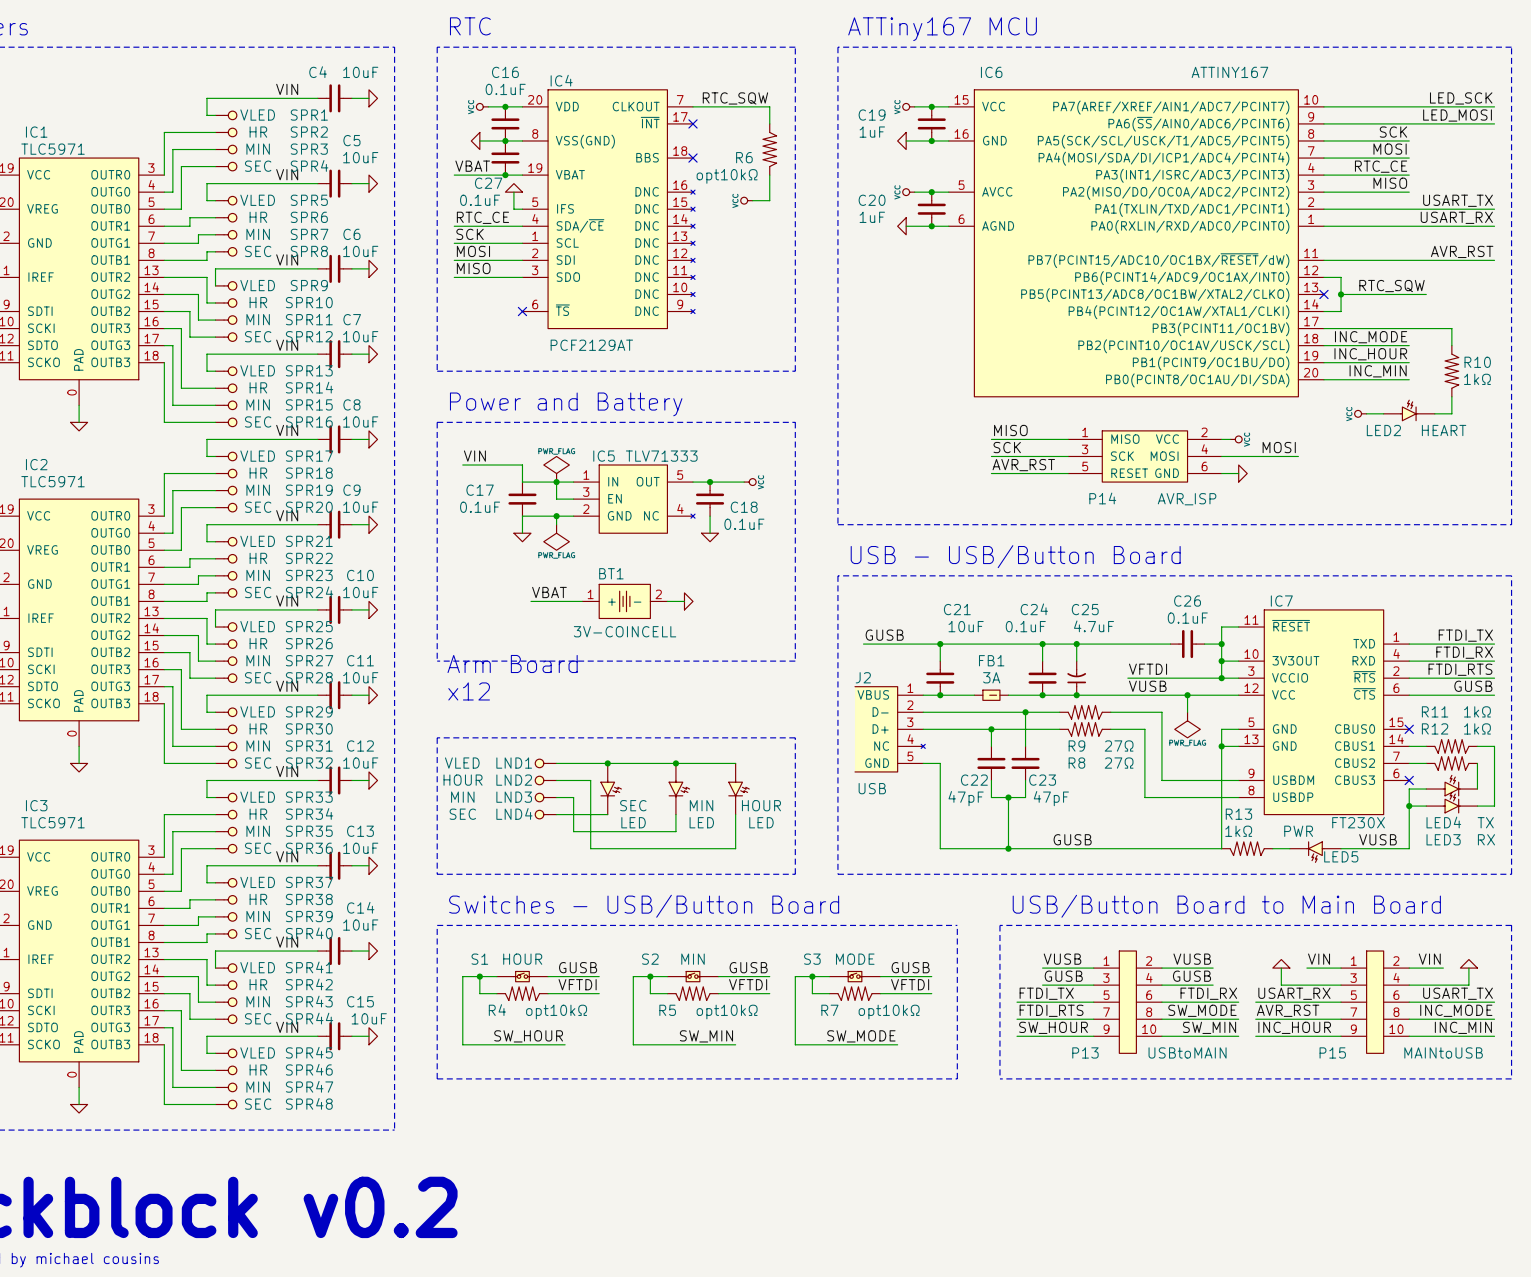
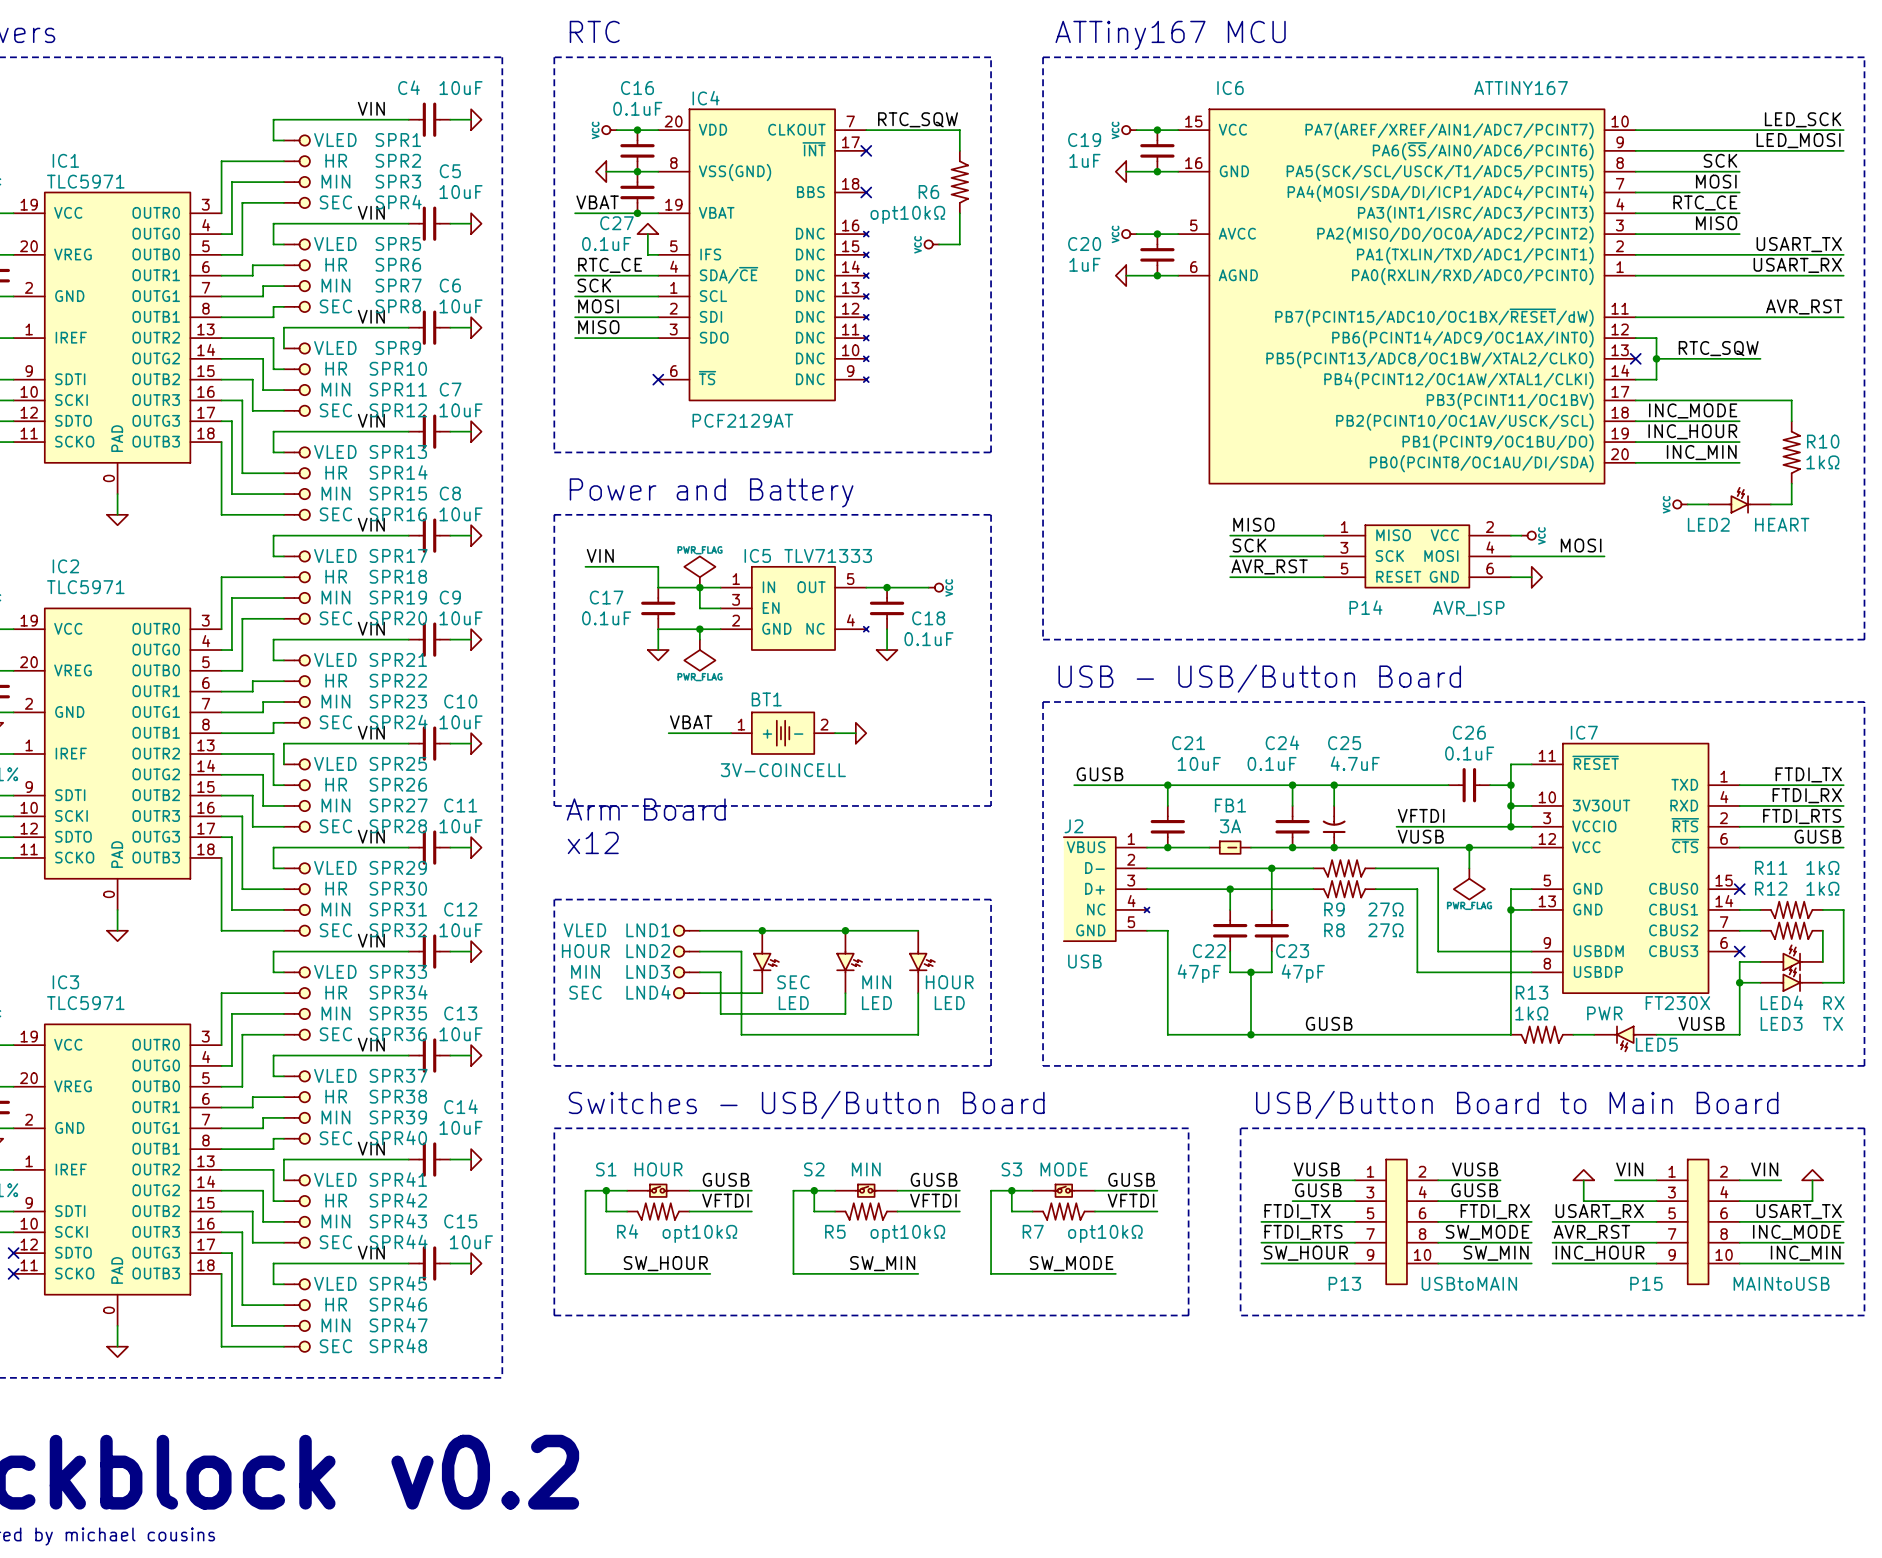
LED4 value: TX (1485, 822) -> RX (1833, 1003)
LED3 value: RX (1486, 839) -> TX (1832, 1023)

